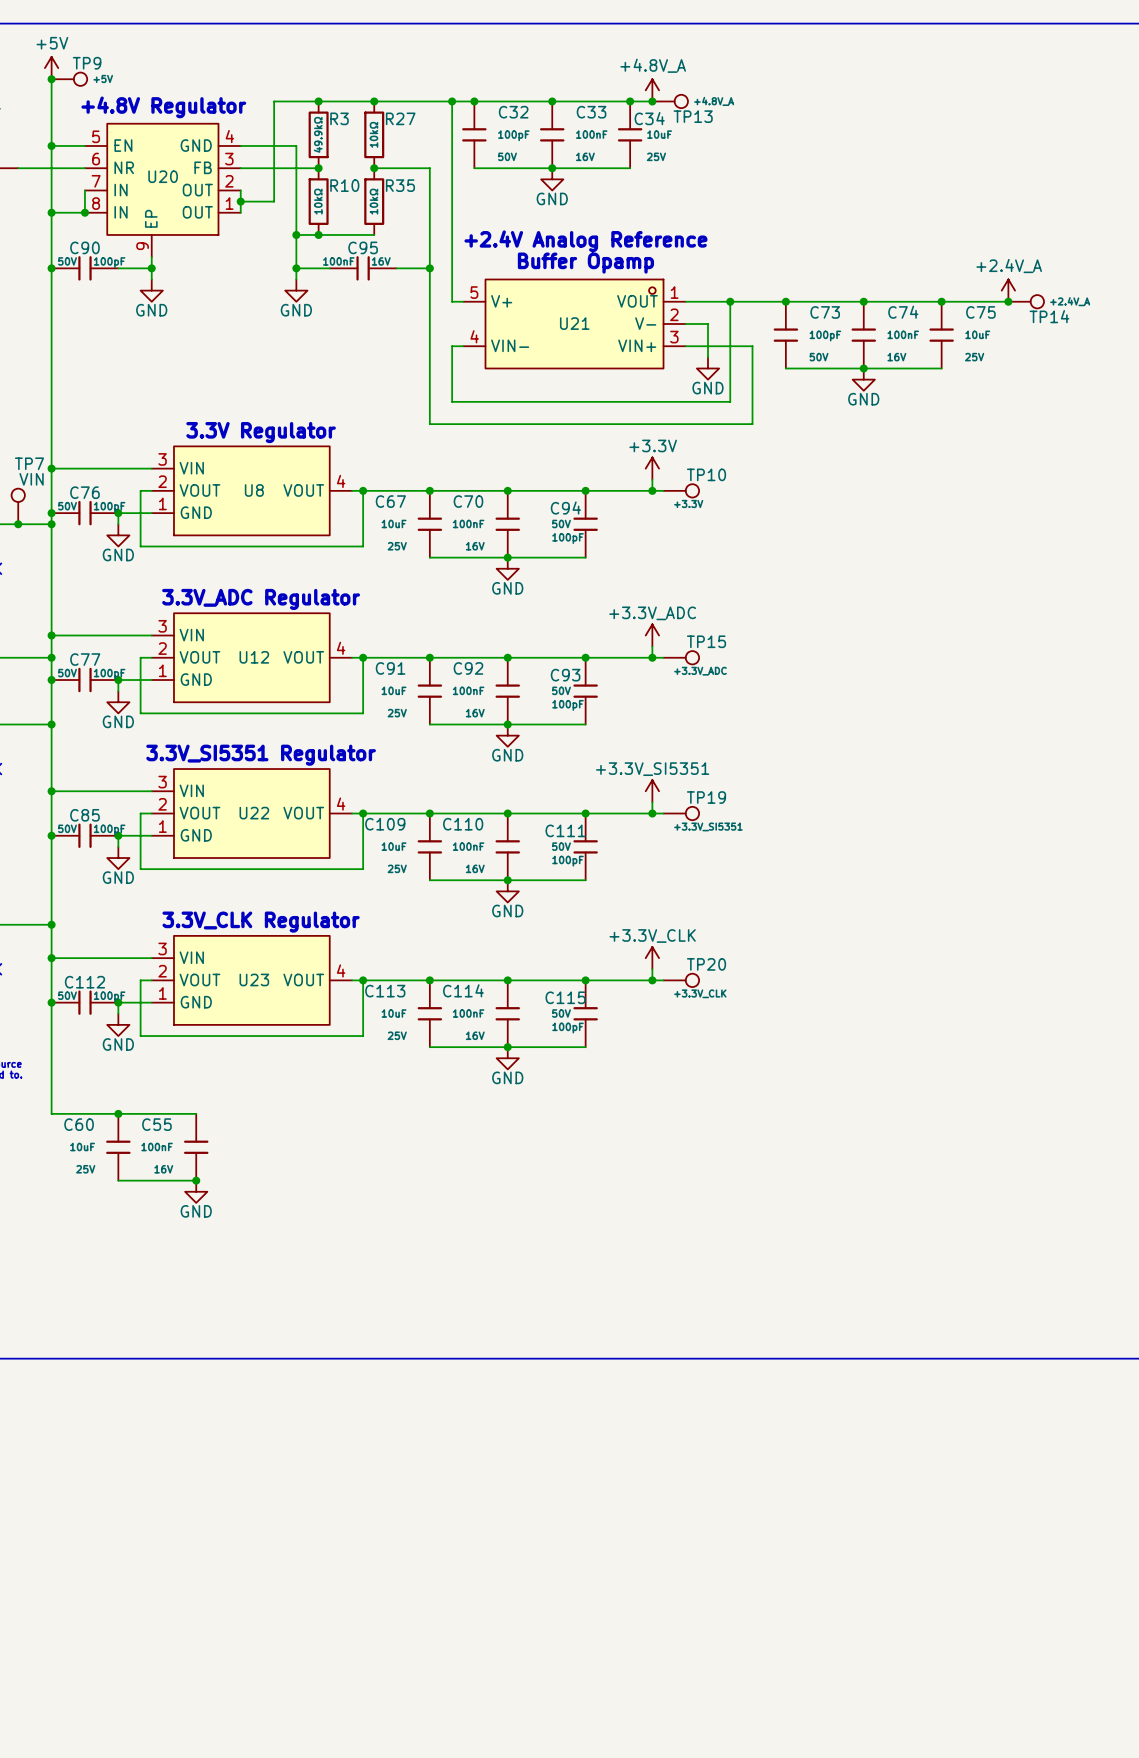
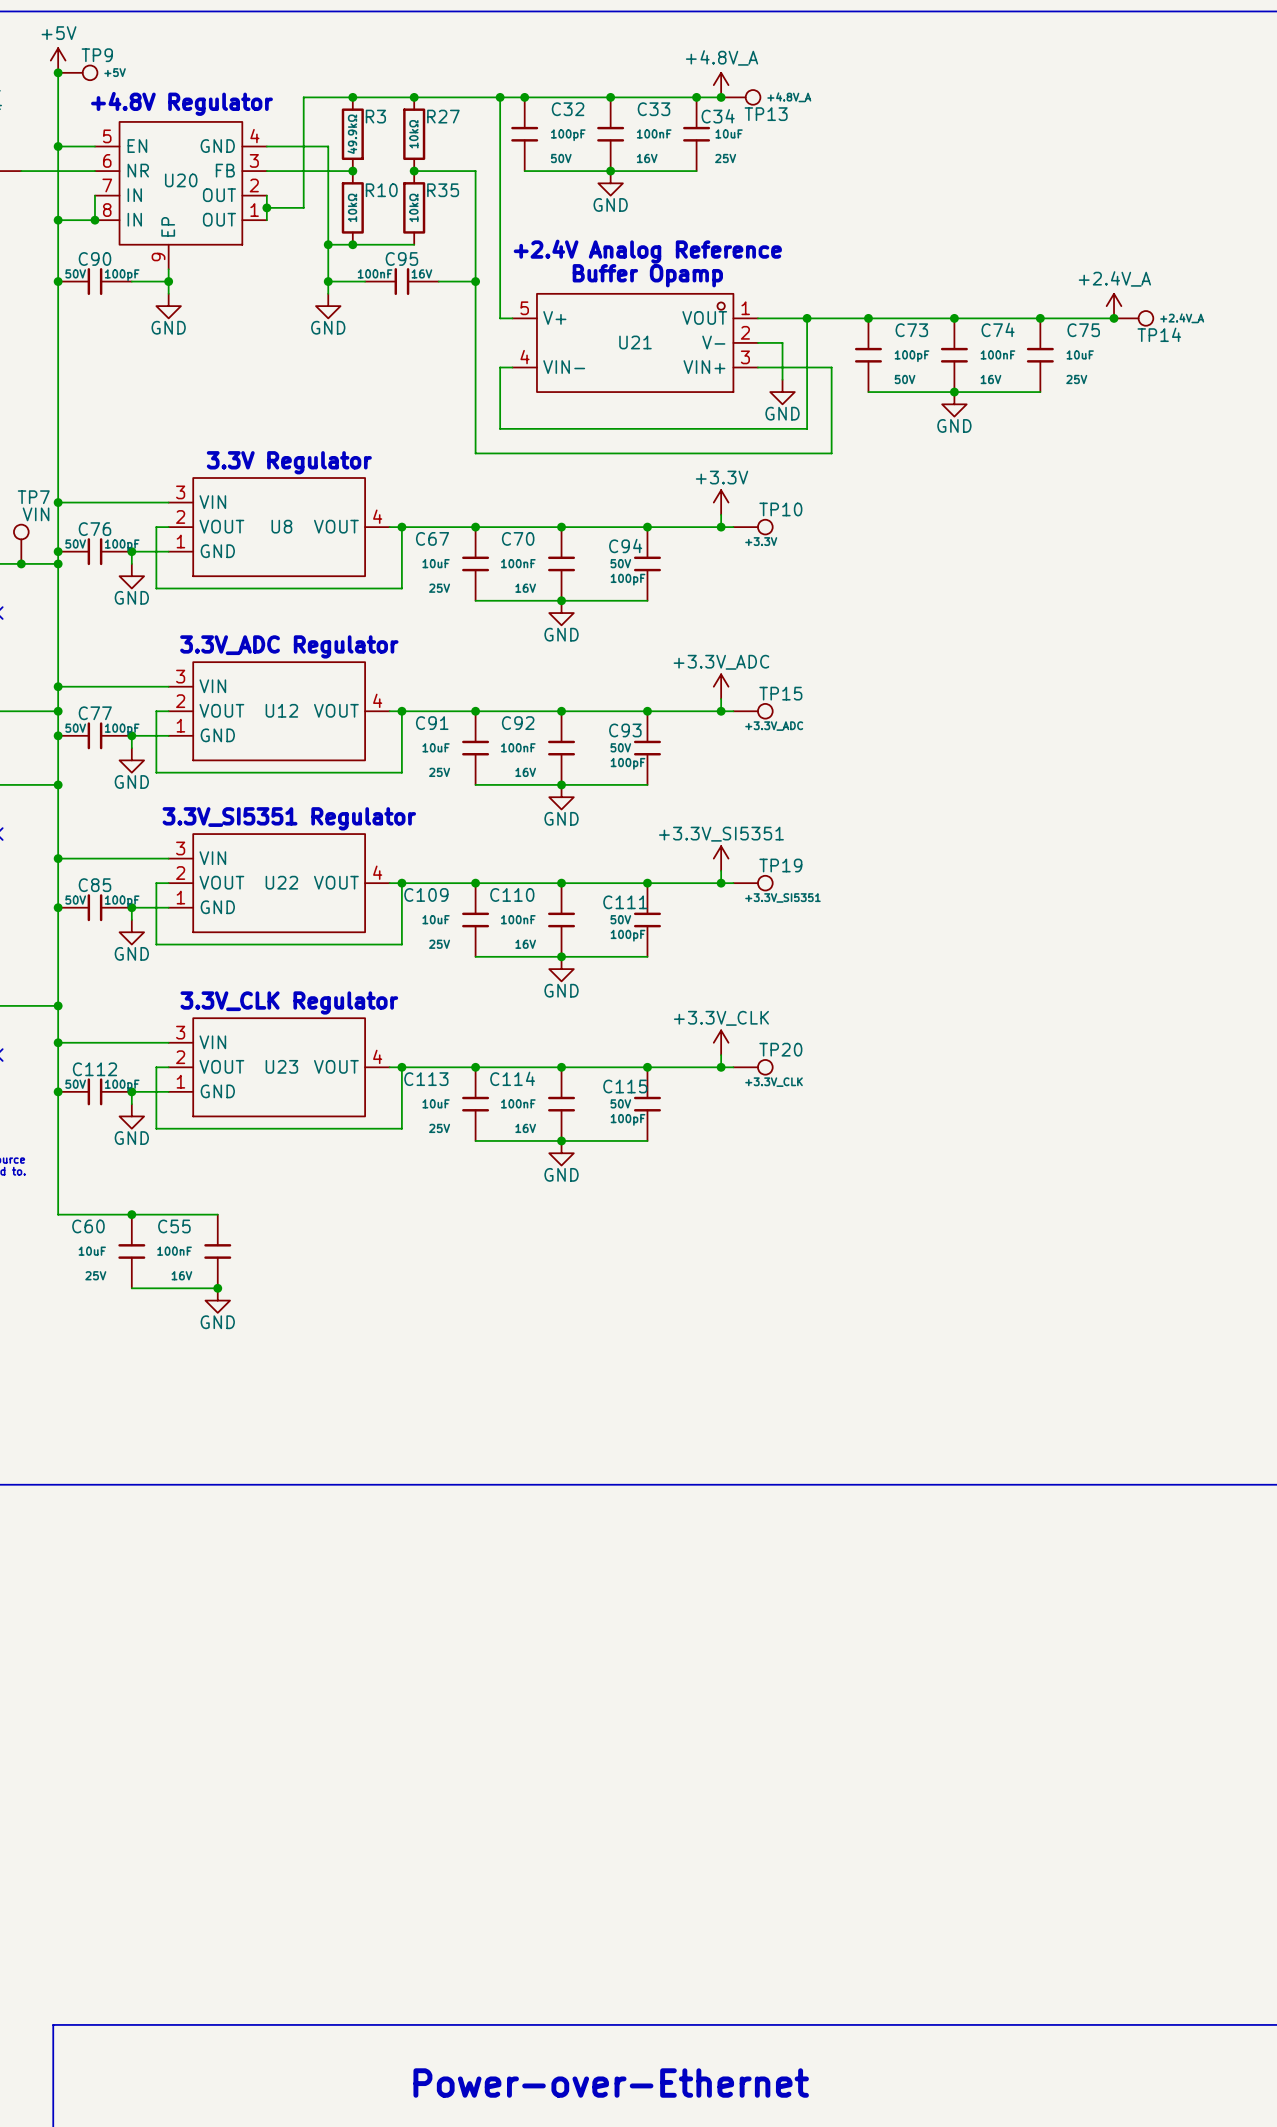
U20 symbol: [84, 123, 241, 258] -> [94, 121, 267, 270]
U21 symbol: [463, 279, 686, 369] -> [512, 293, 758, 393]
U8 symbol: [151, 446, 352, 536] -> [168, 478, 390, 577]
U12 symbol: [151, 613, 352, 703] -> [168, 662, 390, 761]
U22 symbol: [151, 769, 352, 859] -> [168, 834, 390, 933]
U23 symbol: [151, 935, 352, 1025] -> [168, 1018, 390, 1117]

